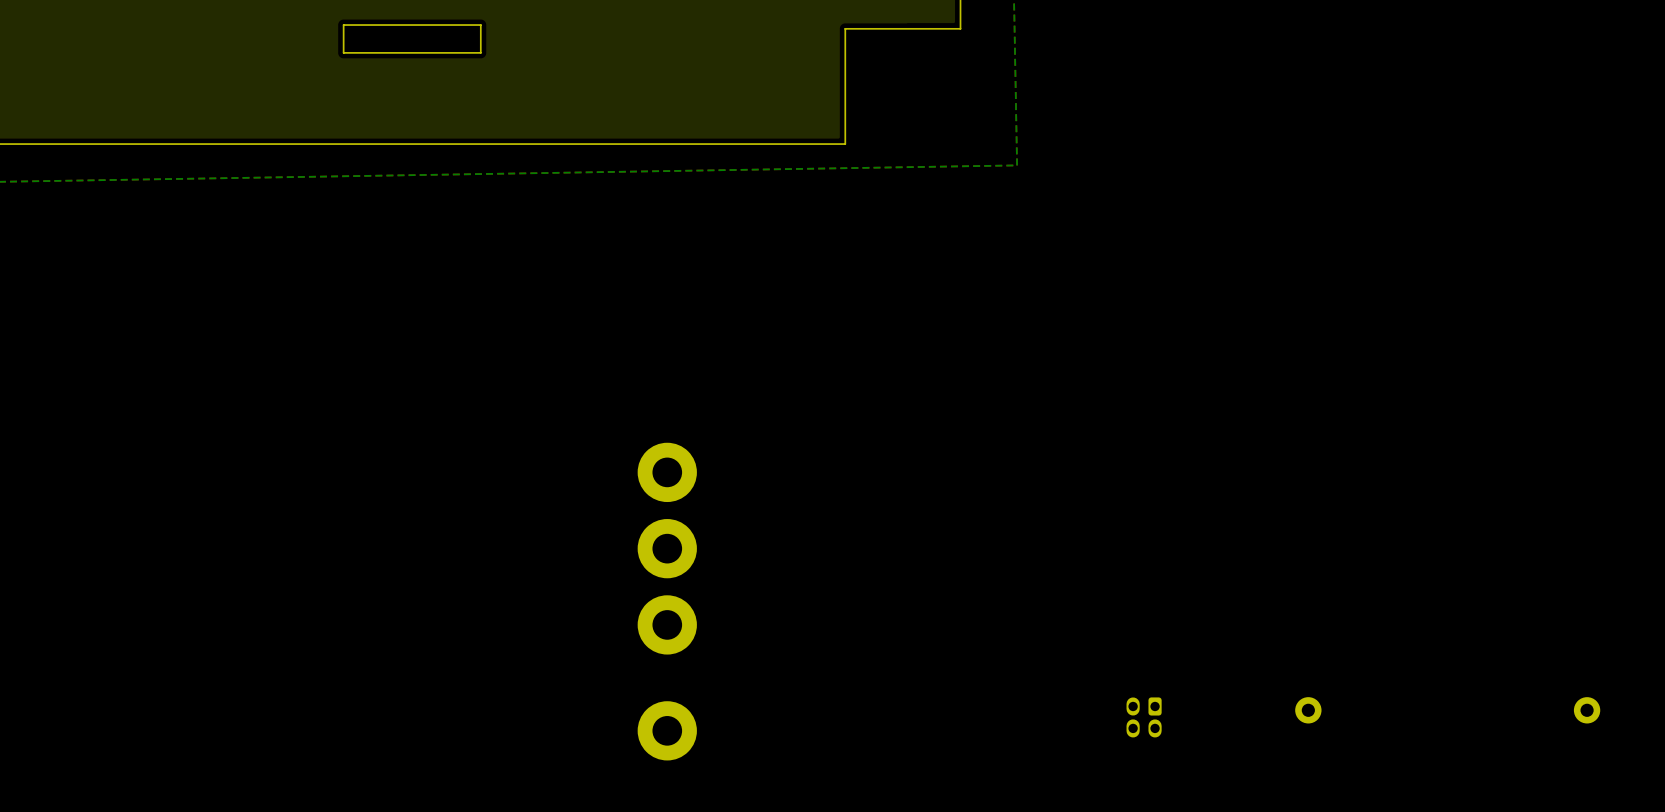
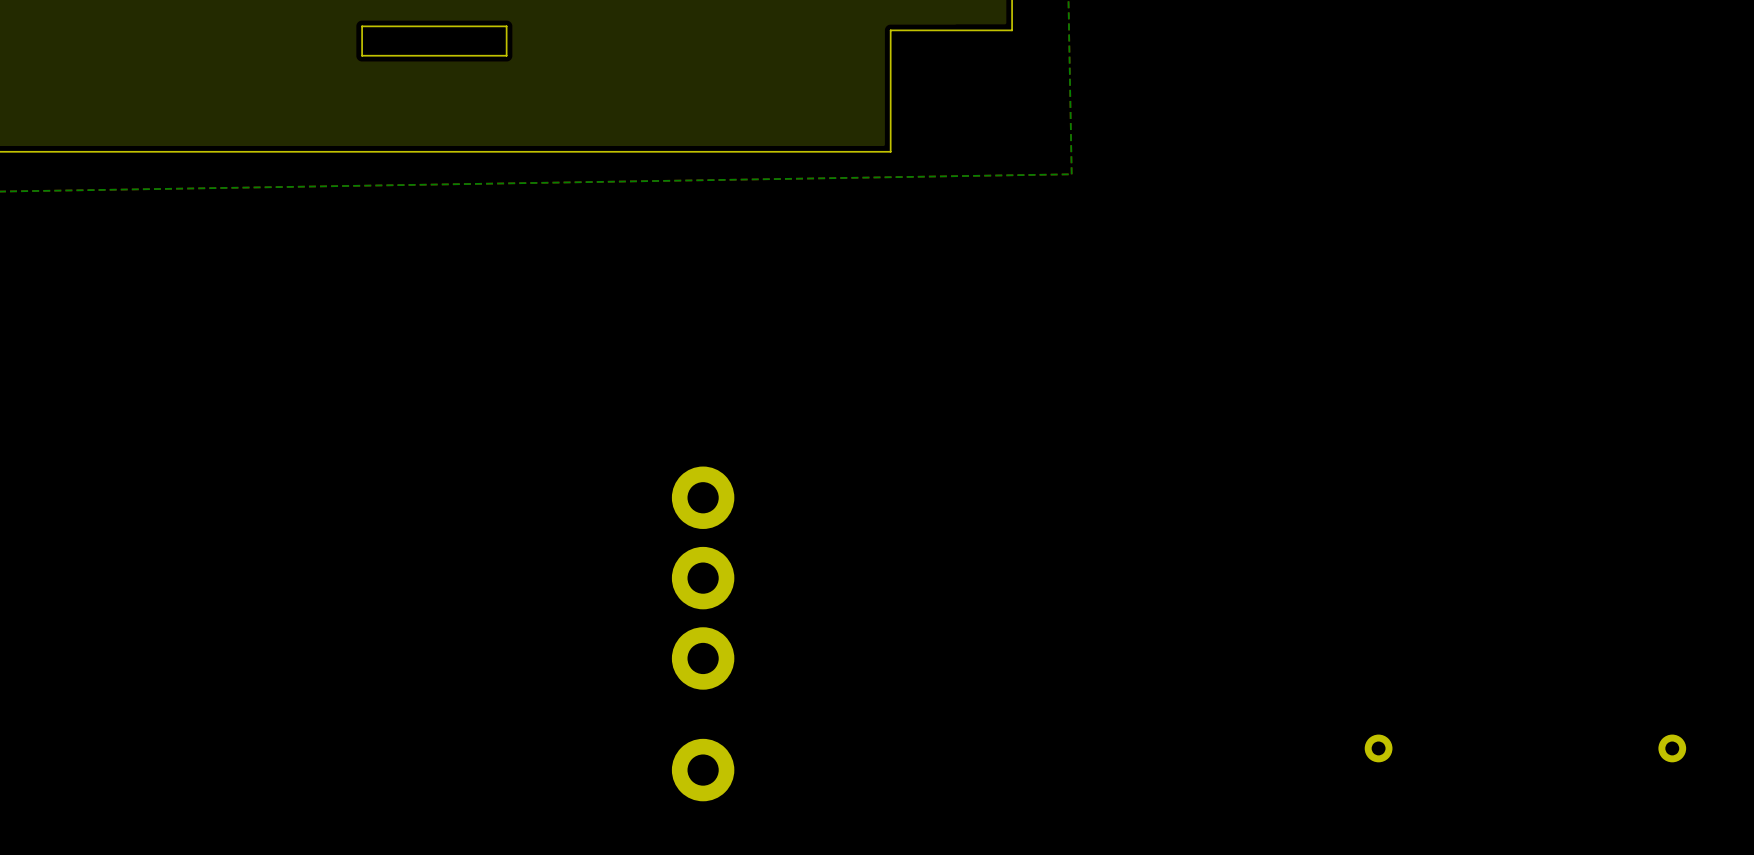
part: (1144, 717) -> none

